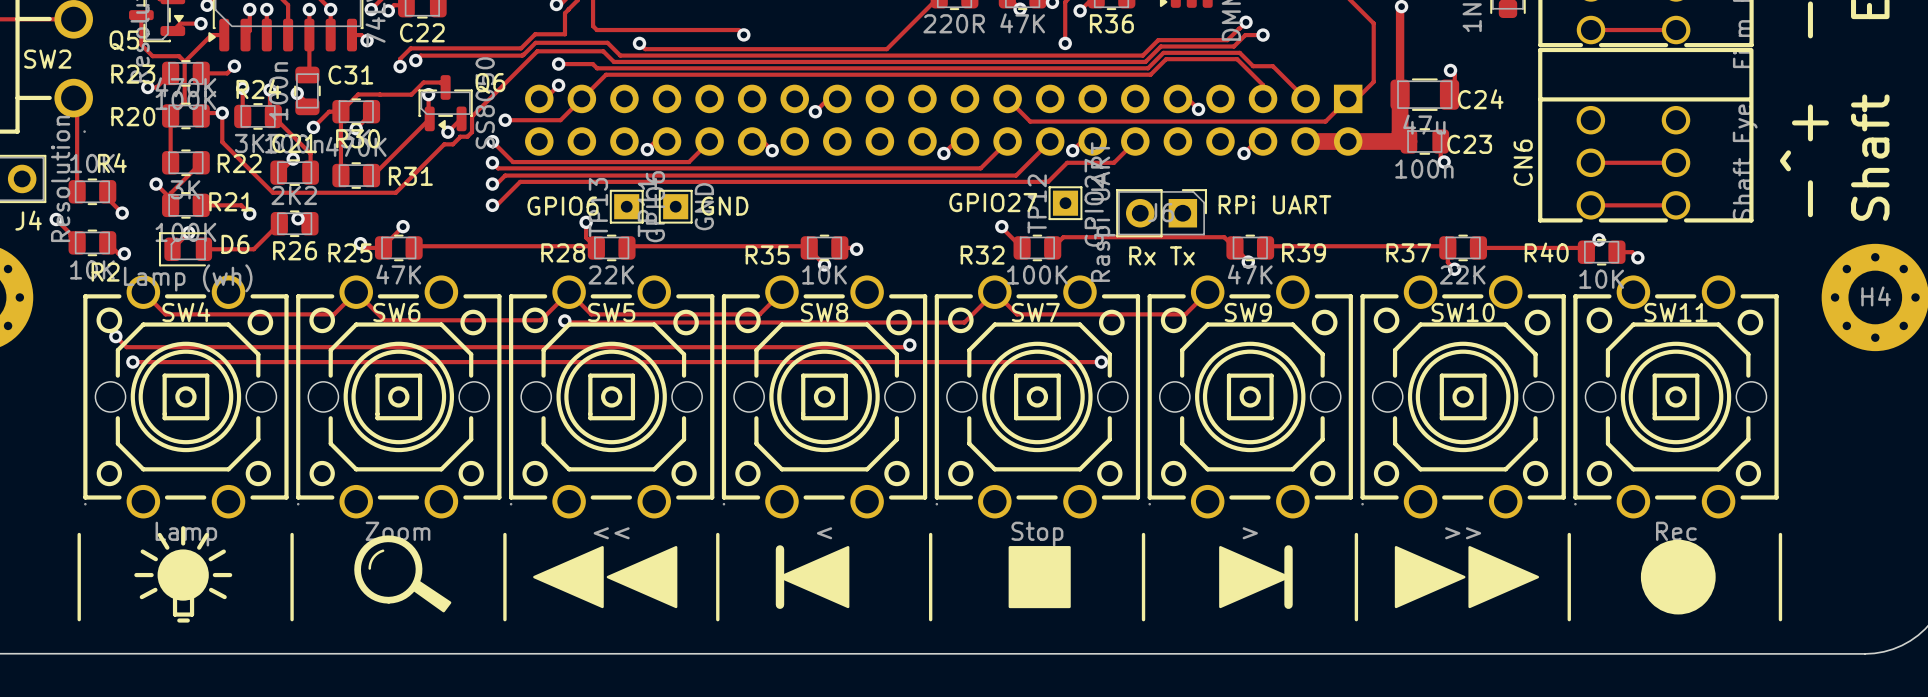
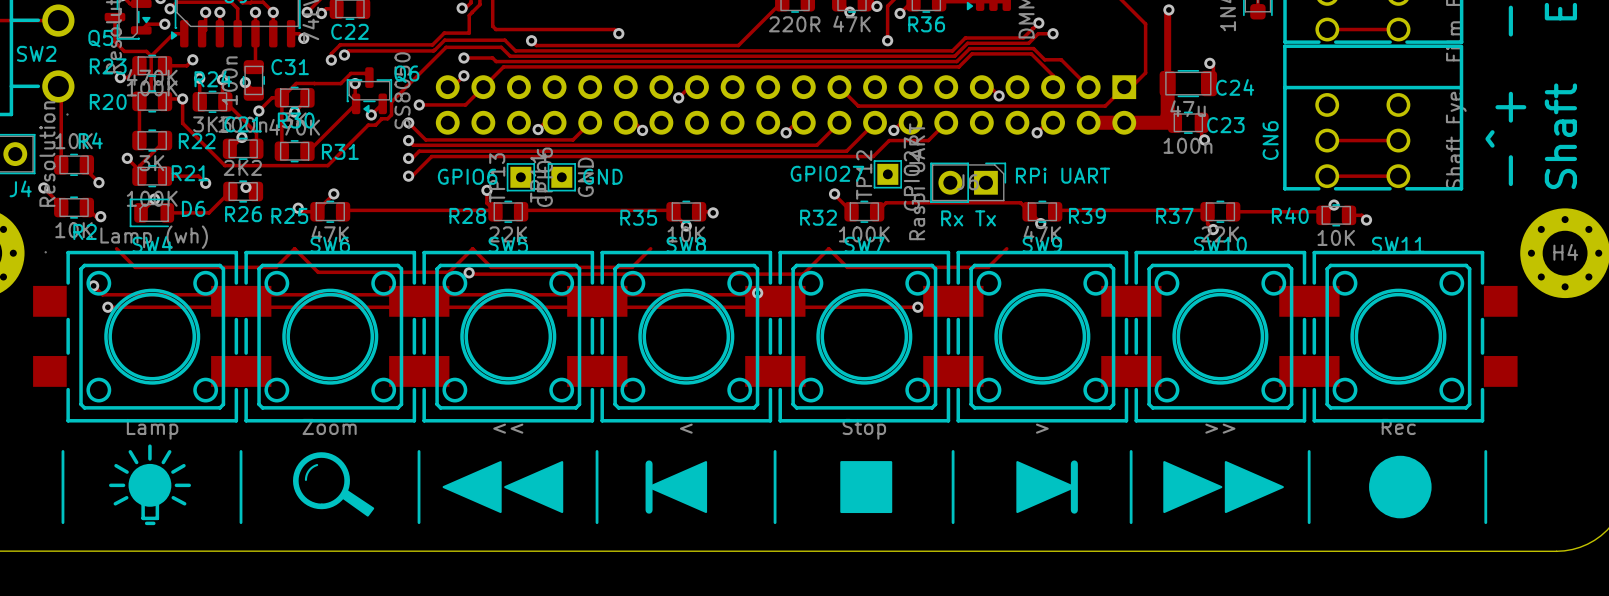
SW4 footprint: [83, 275, 289, 519] -> [33, 250, 272, 423]
SW6 footprint: [296, 275, 502, 519] -> [211, 250, 450, 423]
SW5 footprint: [509, 275, 715, 519] -> [389, 250, 628, 423]
SW8 footprint: [721, 275, 928, 519] -> [567, 250, 806, 423]
SW7 footprint: [934, 275, 1141, 519] -> [745, 250, 984, 423]
SW9 footprint: [1147, 275, 1354, 519] -> [923, 250, 1162, 423]
SW10 footprint: [1360, 275, 1566, 519] -> [1101, 250, 1340, 423]
SW11 footprint: [1573, 275, 1779, 519] -> [1279, 250, 1518, 423]

